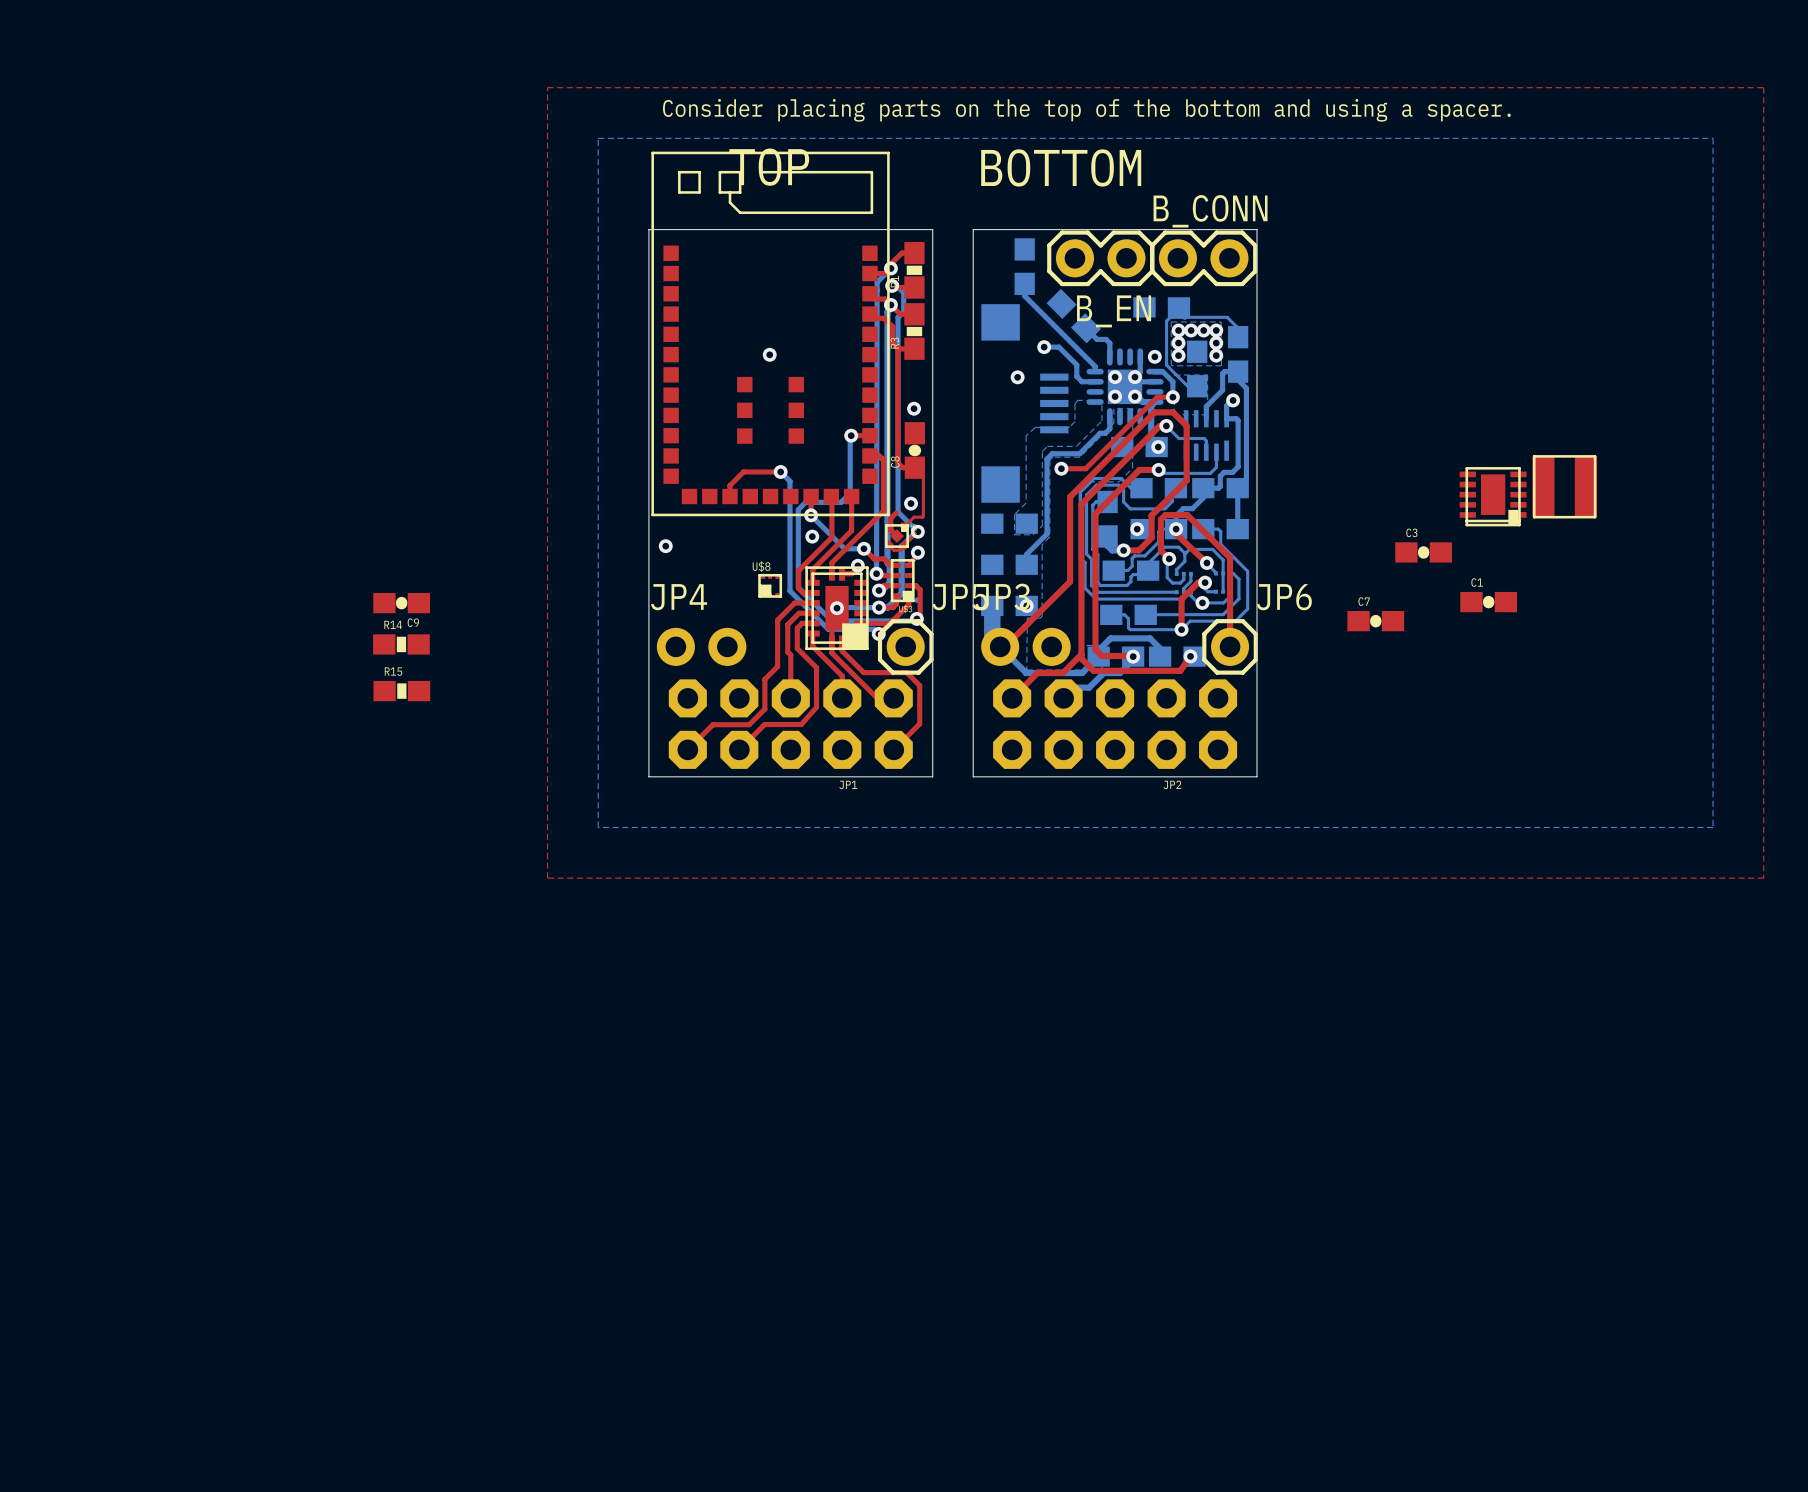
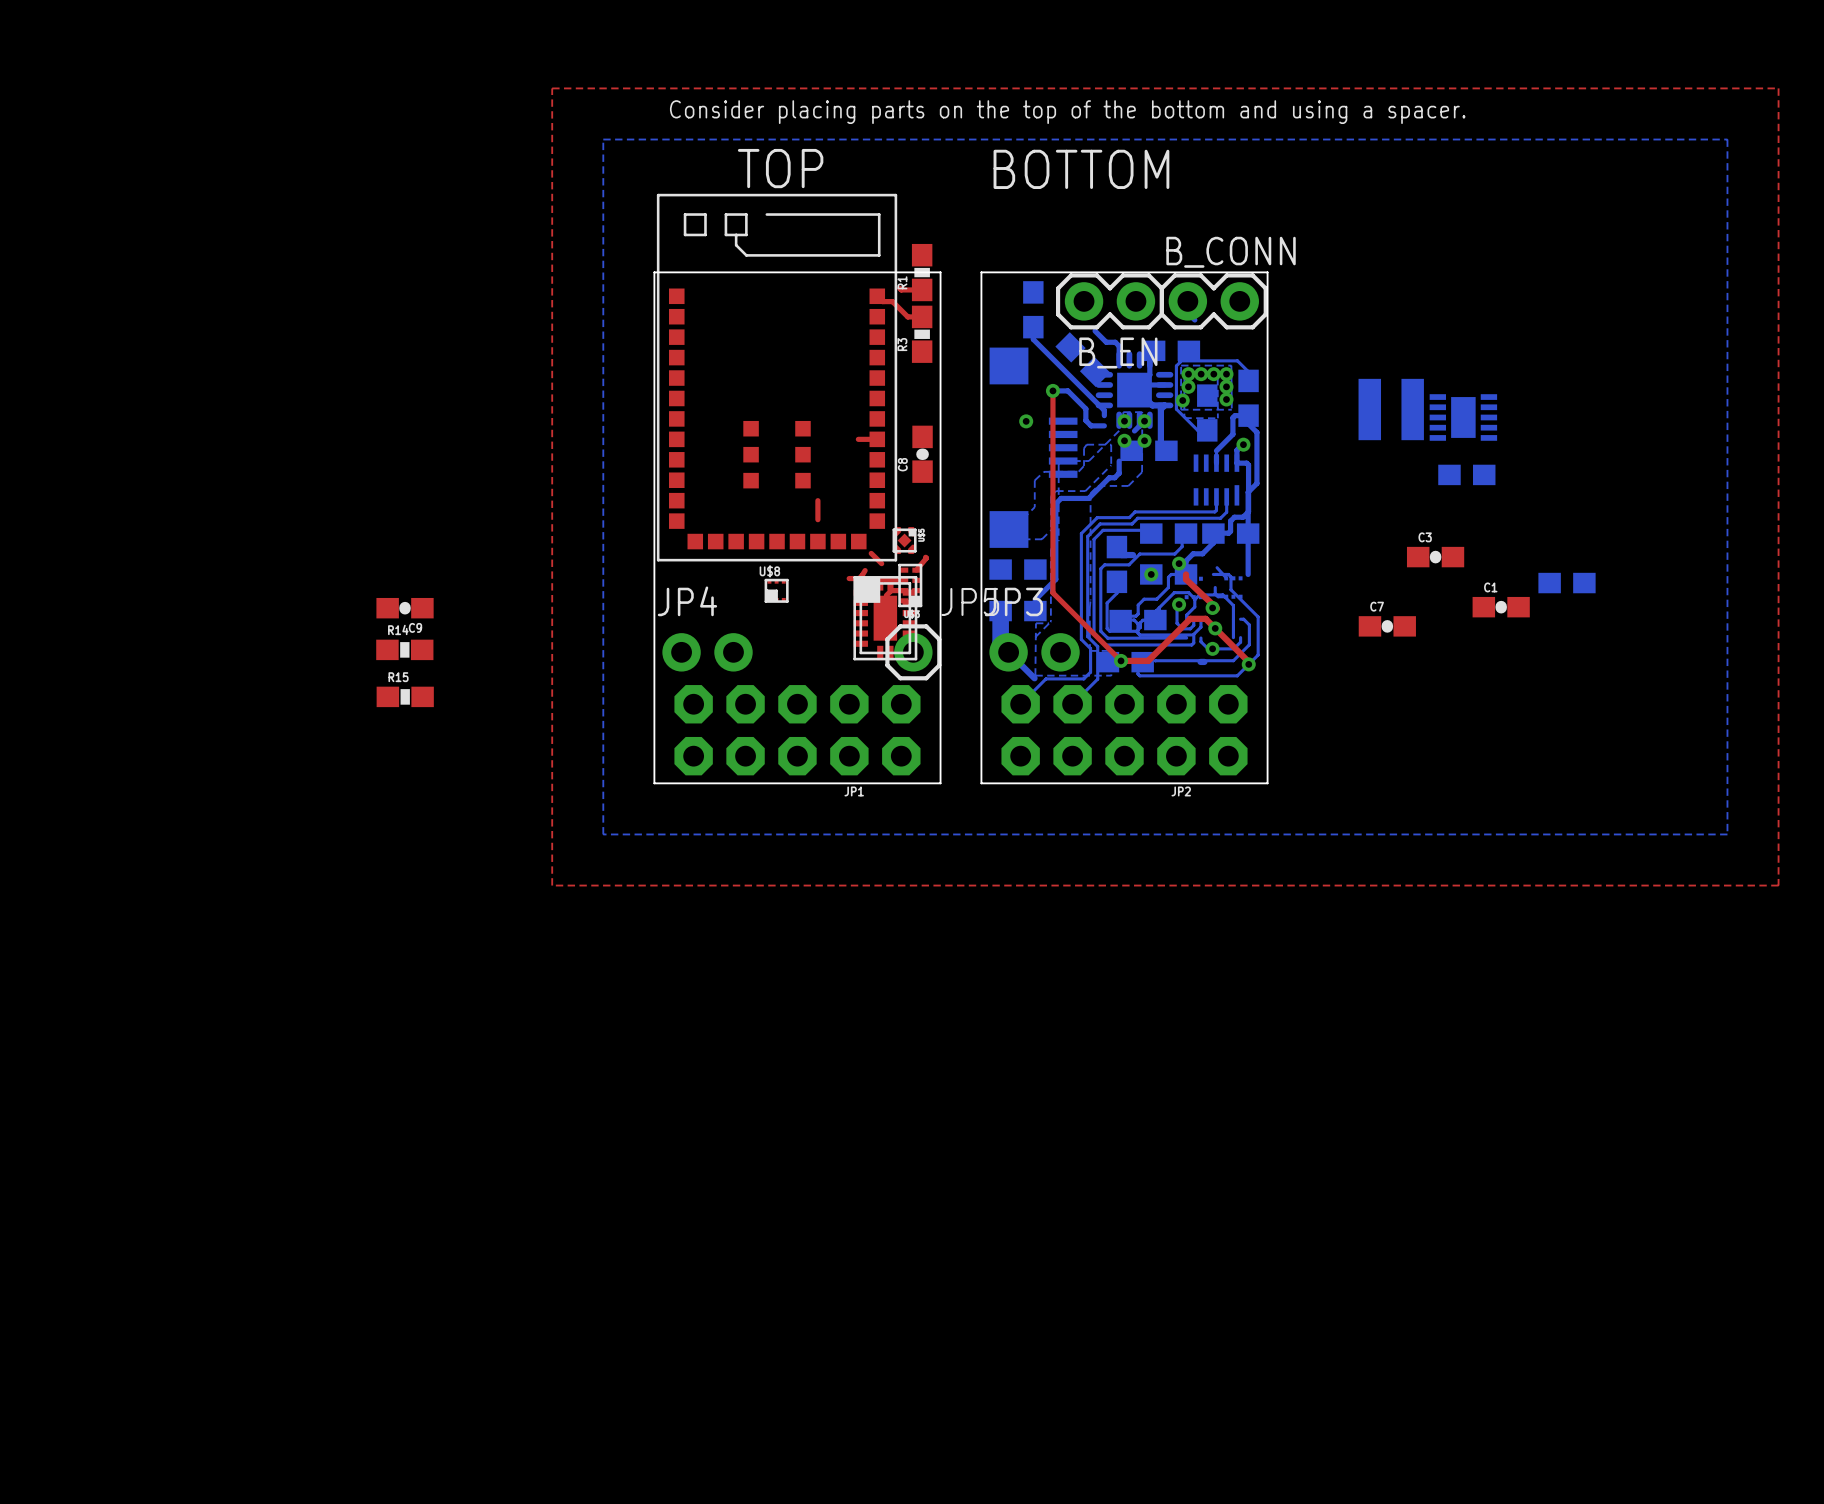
top track: (914, 253) (901, 253) (890, 264) (890, 268) (885, 273) (869, 273) -> none
B_EN position: (1100, 258) -> (1109, 301)
B_CONN position: (1203, 258) -> (1213, 301)
part position: (1024, 266) -> (1033, 309)
bottom track: (890, 268) (877, 282) (876, 573) -> none
via: (890, 268) -> none
board edge: (648, 270) (648, 229) (932, 229) (932, 270) -> (654, 272) (940, 272)
board edge: (973, 270) (973, 229) (1257, 229) (1257, 270) -> (981, 272) (1267, 272)
bottom track: (1024, 283) (1024, 296) (1095, 366) (1095, 371) -> (1033, 327) (1033, 339) (1104, 410) (1104, 415)
bottom track: (892, 285) (896, 285) (903, 292) (903, 311) (898, 317) (898, 512) (917, 531) -> none
via: (892, 285) -> none
bottom track: (889, 301) (890, 304) (887, 311) (887, 562) (889, 565) (889, 582) (882, 590) (878, 590) -> none
via: (890, 304) -> none
part: (1161, 307) -> none
top track: (869, 314) (874, 318) (884, 318) (892, 327) (892, 342) (898, 348) (914, 348) -> none
part position: (1073, 316) -> (1082, 359)
via: (1178, 330) -> none
via: (1191, 330) -> none
via: (1203, 330) -> none
via: (1216, 330) -> none
part position: (770, 333) -> (777, 377)
bottom track: (1238, 337) (1236, 326) (1227, 317) (1170, 317) (1166, 320) (1166, 362) -> (1248, 380) (1247, 370) (1237, 360) (1180, 360) (1176, 365)
via: (1178, 343) -> none
via: (1216, 343) -> none
bottom track: (1044, 347) (1058, 347) (1076, 364) (1076, 376) (1082, 381) (1095, 381) -> (1052, 390) (1067, 390) (1085, 408) (1085, 420) (1091, 425) (1104, 425)
via: (1044, 347) -> none
part: none -> (1171, 350)
top track: (898, 348) (898, 463) (902, 467) (914, 467) (923, 476) (923, 516) (914, 517) (903, 525) -> none
via: (769, 354) -> none
part: (1238, 354) -> none
via: (1178, 355) -> none
via: (1216, 355) -> none
via: (1154, 356) -> none
bottom zone outline: (1171, 362) (1171, 321) (1221, 321) (1221, 365) (1171, 365) -> (1181, 365) (1231, 365) (1231, 409) (1181, 409) (1181, 368)
bottom track: (1166, 365) (1187, 386) (1197, 386) -> (1176, 368) (1176, 409) (1197, 430) (1207, 430)
part: (1197, 369) -> none
bottom track: (1155, 371) (1162, 371) (1172, 381) (1172, 397) (1169, 396) -> none
via: none -> (1188, 374)
via: none -> (1201, 374)
via: none -> (1213, 374)
via: none -> (1226, 374)
via: (1017, 377) -> none
via: (1115, 377) -> none
via: (1134, 377) -> none
via: none -> (1188, 386)
via: none -> (1226, 386)
top track: none -> (1052, 390) (1052, 592) (1121, 660) (1148, 660) (1190, 618) (1205, 618) (1248, 661) (1248, 664)
via: none -> (1052, 390)
part: none -> (1248, 398)
via: (1115, 396) -> none
via: (1134, 396) -> none
via: none -> (1226, 399)
top track: (1172, 397) (1157, 397) (1085, 468) (1061, 468) -> none
bottom track: (1233, 400) (1226, 405) (1226, 418) (1236, 418) (1238, 420) (1238, 461) -> (1243, 444) (1236, 450) (1236, 463) (1246, 463) (1248, 465)
via: (1233, 400) -> none
part position: (1024, 403) -> (1033, 447)
via: (914, 408) -> none
part: none -> (1207, 412)
bottom track: (1109, 416) (1109, 428) (1105, 433) (1100, 433) (1079, 453) (1052, 453) (1047, 459) (1047, 499) -> (1119, 461) (1119, 473) (1114, 477) (1109, 477) (1088, 498) (1061, 498) (1055, 503)
via: none -> (1026, 421)
via: none -> (1124, 421)
bottom track: none -> (1144, 421) (1134, 430)
via: none -> (1144, 421)
bottom track: (1206, 418) (1206, 406) (1222, 390) (1222, 373) (1224, 371) (1238, 371) (1238, 379) (1246, 388) (1246, 428) -> (1216, 450) (1232, 434) (1232, 417) (1235, 415) (1248, 415) (1248, 424) (1256, 432)
bottom track: (1166, 425) (1178, 438) (1204, 438) (1206, 447) -> none
top track: (1166, 425) (1159, 425) (1081, 504) (1081, 658) (1093, 670) (1180, 670) (1190, 656) -> none
via: (1166, 425) -> none
bottom track: (851, 435) (850, 493) (841, 502) (805, 502) (798, 509) (798, 587) (831, 620) (914, 620) (916, 618) -> none
via: (851, 435) -> none
part: (1206, 435) -> none
via: none -> (1124, 440)
via: none -> (1144, 440)
via: none -> (1243, 444)
via: (1158, 447) -> none
bottom track: (1216, 452) (1216, 467) (1210, 473) (1162, 473) (1158, 469) -> none
top track: (869, 455) (879, 455) (883, 460) (883, 511) (831, 562) (831, 573) -> none
bottom track: (1238, 466) (1232, 472) (1224, 472) (1220, 476) (1220, 486) (1218, 488) (1203, 488) (1203, 497) (1192, 508) (1183, 508) (1176, 515) (1176, 529) (1161, 529) (1158, 531) (1158, 542) (1144, 555) (1134, 555) (1132, 558) (1132, 566) (1127, 570) (1113, 570) -> (1248, 470) (1248, 511) (1243, 517) (1234, 517) (1230, 521) (1230, 531) (1228, 533) (1213, 533) (1213, 542) (1202, 553) (1193, 553) (1186, 560) (1186, 574) (1171, 574) (1168, 577) (1168, 587) (1156, 599) (1144, 599) (1138, 605) (1138, 613) (1135, 616) (1123, 616)
via: (1061, 468) -> none
top track: (1158, 469) (1139, 469) (1095, 513) (1095, 649) (1101, 656) (1133, 656) -> none
via: (1158, 469) -> none
part: none -> (1466, 474)
bottom track: (780, 471) (790, 481) (790, 590) (828, 629) (874, 629) (878, 633) -> none
top track: (780, 471) (743, 471) (730, 485) (730, 500) (730, 501) (730, 496) (730, 496) -> none
via: (780, 471) -> none
bottom zone outline: (1026, 476) (1026, 435) (1035, 427) (1069, 427) (1074, 421) (1074, 404) (1077, 400) (1101, 400) (1101, 420) (1076, 446) (1047, 446) (1042, 451) (1042, 492) -> (1034, 480) (1043, 471) (1078, 471) (1084, 465) (1084, 448) (1086, 444) (1111, 444) (1111, 465) (1085, 491) (1056, 491) (1051, 496)
part footprint: [1192, 478, 1249, 499] -> [1193, 454, 1240, 506]
bottom track: (1142, 485) (1140, 488) (1131, 488) (1121, 478) (1094, 478) (1080, 492) (1080, 557) (1085, 562) (1085, 588) (1096, 599) (1181, 599) (1183, 597) (1183, 588) (1190, 581) (1190, 573) -> none
part side: top (1564, 486) -> bottom (1391, 409)
part: (1158, 488) -> none
bottom track: (1175, 488) (1172, 491) (1172, 501) (1164, 508) (1130, 508) (1123, 501) (1123, 490) (1118, 485) (1096, 485) (1086, 495) (1086, 554) (1091, 559) (1091, 563) -> (1185, 533) (1182, 536) (1182, 546) (1174, 554) (1139, 554) (1128, 564) (1104, 564) (1100, 568)
bottom track: none -> (1216, 496) (1214, 511) (1135, 511) (1129, 517) (1097, 517) (1081, 533) (1081, 639) (1090, 648) (1090, 672) (1083, 678) (1046, 678) (1020, 704)
top track: (831, 496) (831, 537) (798, 570) (798, 588) (803, 592) (812, 592) -> none
top track: (851, 496) (851, 530) (812, 569) (812, 582) -> none
part side: top (1493, 496) -> bottom (1463, 417)
bottom track: (1107, 501) (1096, 501) (1092, 505) (1092, 549) (1097, 554) (1097, 582) (1100, 585) (1127, 585) (1133, 574) (1141, 574) (1148, 570) (1145, 566) (1149, 562) -> none
via: (911, 503) -> none
top track: (896, 512) (890, 518) (890, 529) (896, 535) -> none
bottom track: (811, 515) (844, 548) (863, 548) -> none
via: (811, 515) -> none
part: (1107, 519) -> none
part: (1009, 523) -> none
bottom track: none -> (1149, 531) (1151, 533) (1152, 531) (1151, 530) (1103, 530) (1094, 539) (1094, 633) (1105, 644) (1191, 644) (1193, 642) (1193, 634) (1200, 627) (1200, 619)
via: (1137, 529) -> none
top track: (1176, 529) (1176, 533) (1206, 562) -> (1186, 574) (1186, 579) (1217, 608)
via: (1176, 529) -> none
bottom track: (1203, 529) (1218, 529) (1220, 531) (1220, 544) (1247, 571) (1247, 608) (1235, 621) (1190, 621) (1181, 629) -> none
bottom track: none -> (1248, 533) (1248, 574)
bottom track: (917, 531) (901, 546) (901, 593) (887, 607) (837, 608) -> none
top track: (917, 531) (900, 550) (893, 550) (890, 546) -> none
via: (917, 531) -> none
bottom track: (1047, 533) (1026, 554) (1026, 564) -> (1055, 538) (1055, 579) (1035, 599) (1035, 610)
via: (812, 536) -> none
via: (665, 546) -> none
via: (863, 548) -> none
top track: (1123, 550) (1139, 550) (1151, 537) (1151, 515) (1186, 480) (1186, 425) (1173, 412) (1154, 412) (1070, 496) (1070, 581) (1004, 646) (1000, 646) -> none
via: (1123, 550) -> none
via: (917, 552) -> none
bottom track: (1185, 553) (1178, 547) (1164, 547) (1146, 566) -> (1195, 598) (1188, 592) (1174, 592) (1156, 611)
top track: (873, 558) (884, 558) (890, 565) (896, 565) -> none
bottom track: (1169, 558) (1167, 560) (1167, 577) (1172, 583) (1180, 583) (1183, 579) (1183, 573) -> (1179, 604) (1177, 606) (1177, 623) (1182, 628) (1190, 628) (1193, 625) (1193, 619)
top track: (1169, 558) (1160, 550) (1160, 519) (1165, 515) (1187, 515) (1230, 557) (1230, 646) -> none
part: none -> (1116, 564)
via: (1206, 562) -> none
via: (857, 565) -> none
via: none -> (1151, 574)
part: none -> (1168, 574)
bottom track: none -> (1213, 574) (1228, 574) (1230, 576) (1230, 589) (1258, 616) (1258, 654) (1237, 675) (1139, 675) (1137, 674) (1137, 664) (1134, 660) (1120, 660)
part: (1130, 570) -> none
via: (876, 573) -> none
bottom track: (1176, 573) (1176, 569) (1184, 561) (1184, 554) (1189, 549) (1212, 549) (1223, 559) (1223, 591) -> (1186, 619) (1186, 615) (1194, 606) (1194, 599) (1199, 594) (1222, 594) (1233, 605) (1233, 637)
bottom track: (1230, 573) (1233, 573) (1238, 579) (1238, 598) (1223, 614) (1145, 614) -> (1240, 619) (1243, 619) (1249, 624) (1249, 644) (1233, 660) (1155, 660)
bottom track: none -> (1116, 581) (1116, 593) (1107, 603) (1107, 628) (1109, 631) (1136, 631) (1142, 620) (1151, 620) (1157, 616) (1155, 611) (1159, 607)
part: none -> (1567, 583)
top track: (1205, 582) (1198, 582) (1181, 599) (1181, 629) -> none
via: (1205, 582) -> none
top track: (908, 585) (916, 585) (920, 589) (920, 615) (916, 618) -> none
bottom track: (1091, 585) (1098, 592) (1176, 592) -> (1100, 590) (1100, 631) (1107, 638) (1186, 638)
via: (878, 590) -> none
bottom track: (1230, 591) (1230, 596) (1223, 602) (1198, 602) (1190, 595) (1190, 592) -> (1240, 637) (1240, 642) (1233, 648) (1208, 648) (1200, 641) (1200, 638)
top track: (896, 595) (896, 603) (892, 607) (878, 607) -> none
top track: (908, 595) (908, 604) (878, 633) -> none
bottom track: (917, 599) (916, 600) -> none
via: none -> (1179, 604)
top track: (812, 603) (794, 603) (777, 620) (777, 666) (764, 679) (764, 709) (749, 724) (712, 724) (687, 749) -> none
via: (1026, 605) -> none
via: (878, 607) -> none
part rotation: 0° (837, 608) -> 180° (885, 618)
via: (837, 608) -> none
top track: (812, 613) (799, 613) (787, 624) (787, 652) (790, 655) (790, 698) -> none
top track: (831, 617) (837, 612) (837, 608) (831, 613) (831, 652) (877, 698) (893, 698) -> none
via: (916, 618) -> none
top track: (812, 623) (802, 623) (797, 628) (797, 648) (816, 667) (816, 707) (801, 724) (764, 724) (739, 749) -> none
top track: (861, 623) (890, 623) -> none
via: none -> (1215, 628)
via: (1181, 629) -> none
top track: (812, 633) (812, 646) (842, 676) (842, 698) -> none
via: (878, 633) -> none
top track: (842, 642) (842, 650) (863, 672) (906, 672) (919, 685) (919, 723) (893, 749) -> none
JP6: (1230, 646) -> none
top track: (1081, 654) (1063, 672) (1037, 672) (1012, 698) -> none
bottom track: (1133, 656) (1133, 659) (1119, 673) (1103, 673) (1089, 687) (1074, 687) -> (1226, 496) (1226, 512) (1220, 518) (1137, 518) (1132, 523) (1100, 523) (1087, 536) (1087, 636) (1097, 646) (1097, 679) (1083, 693)
via position: (1133, 656) -> (1121, 660)
bottom track: (1160, 656) (1160, 648) (1149, 638) (1110, 638) (1098, 650) (1098, 656) (1082, 673) (1025, 673) -> none
part: (1177, 656) -> none
via position: (1190, 656) -> (1212, 648)
via: none -> (1248, 664)

